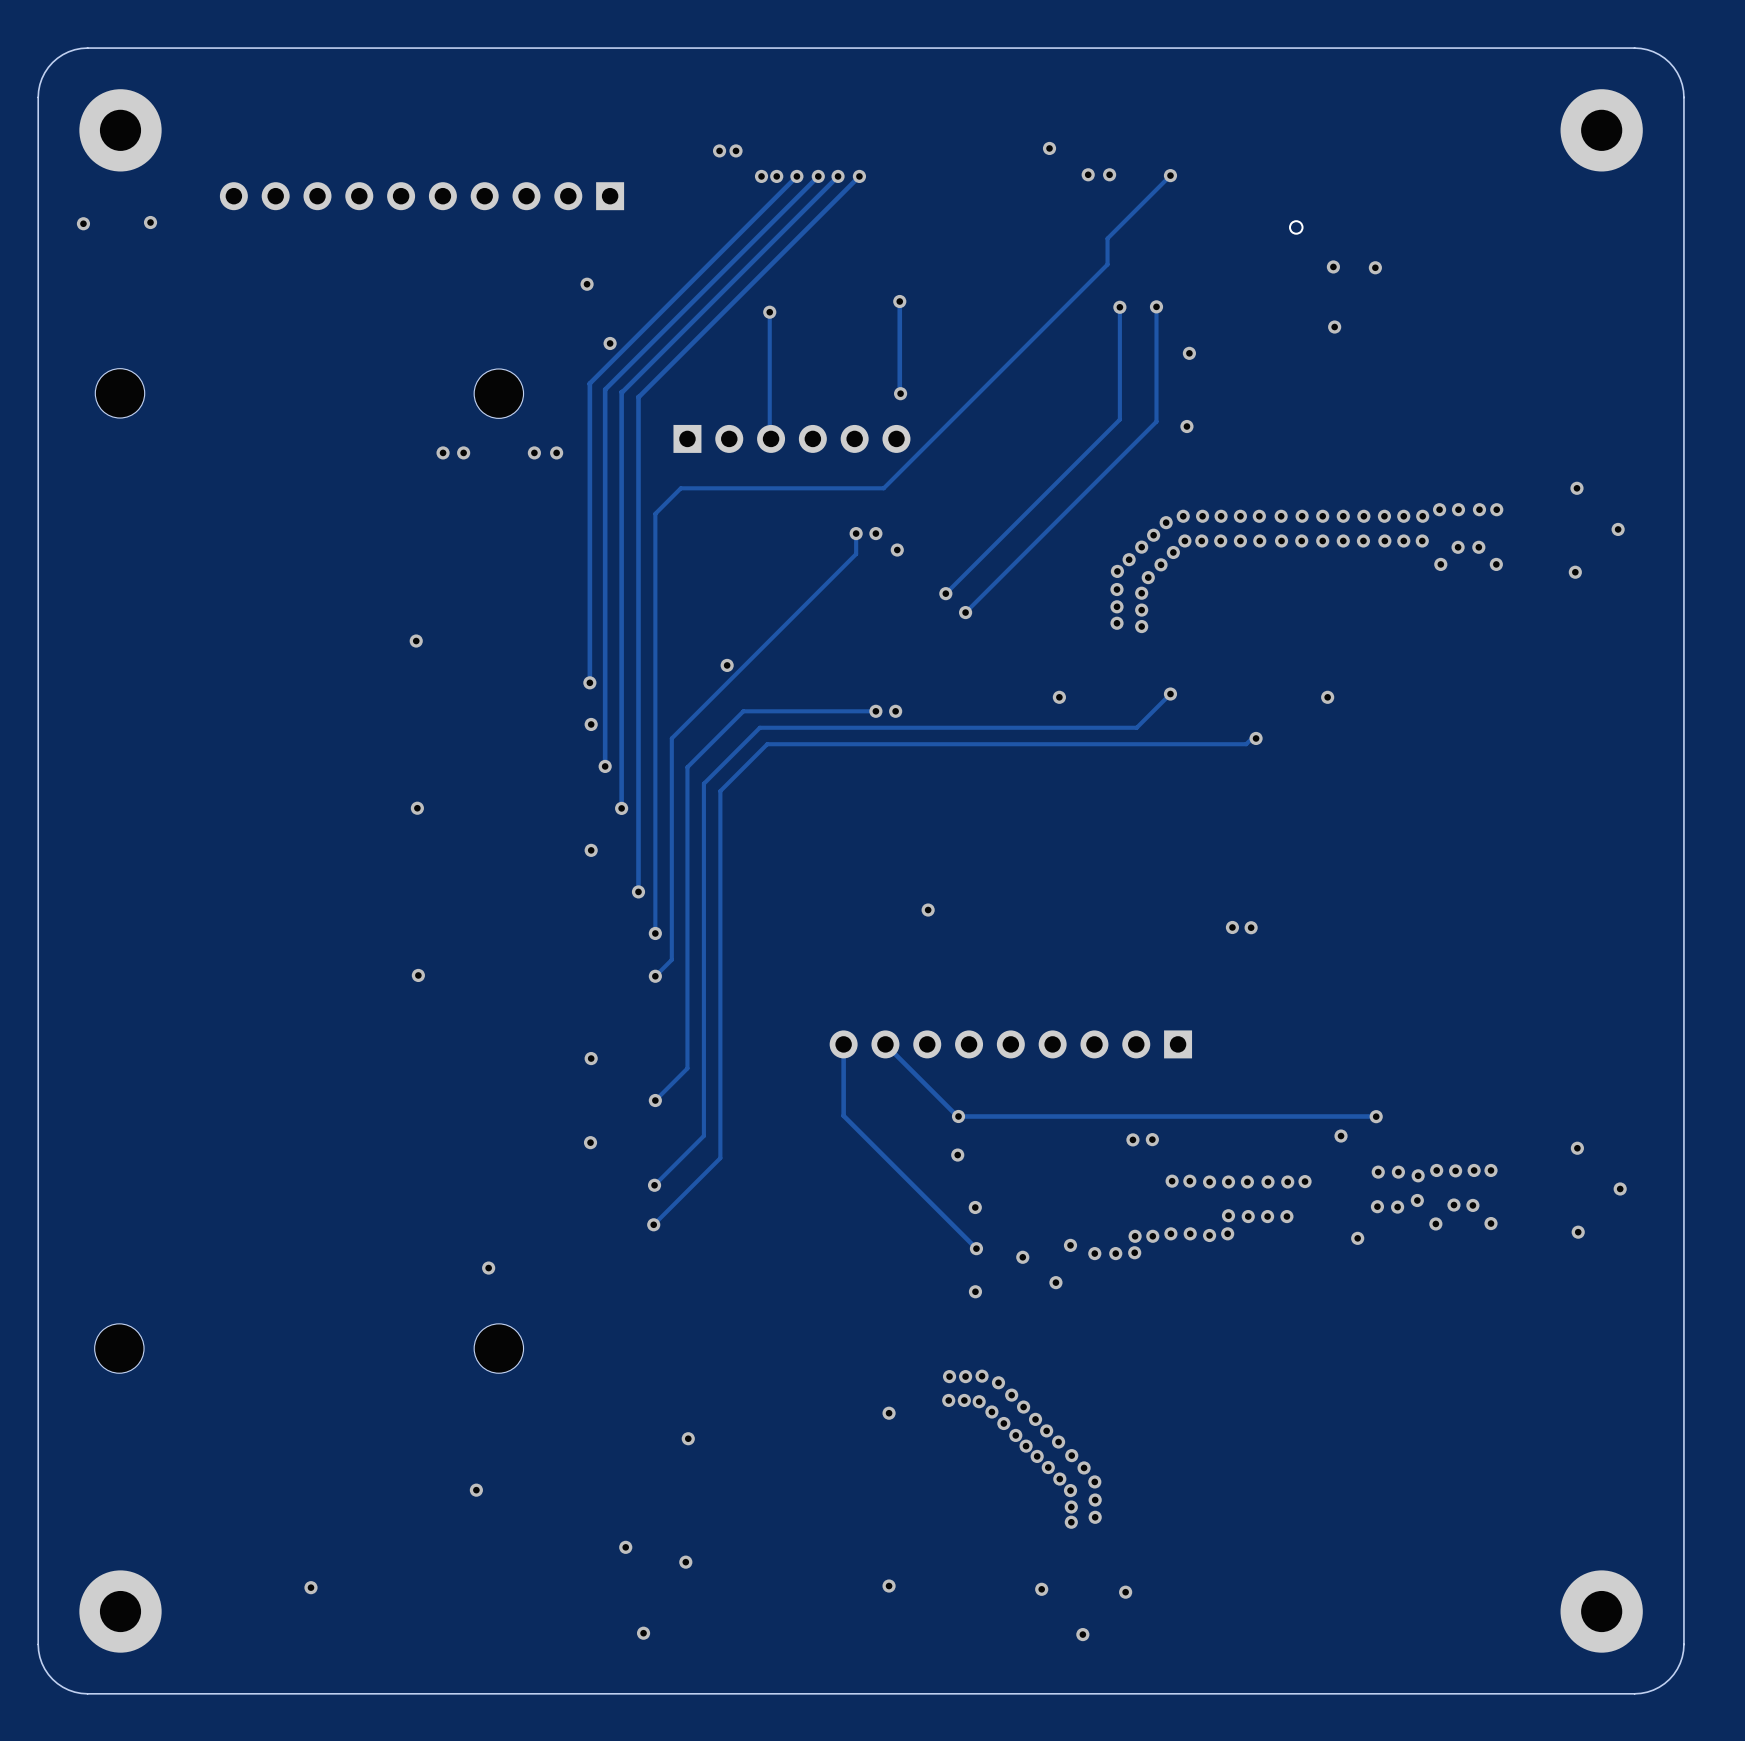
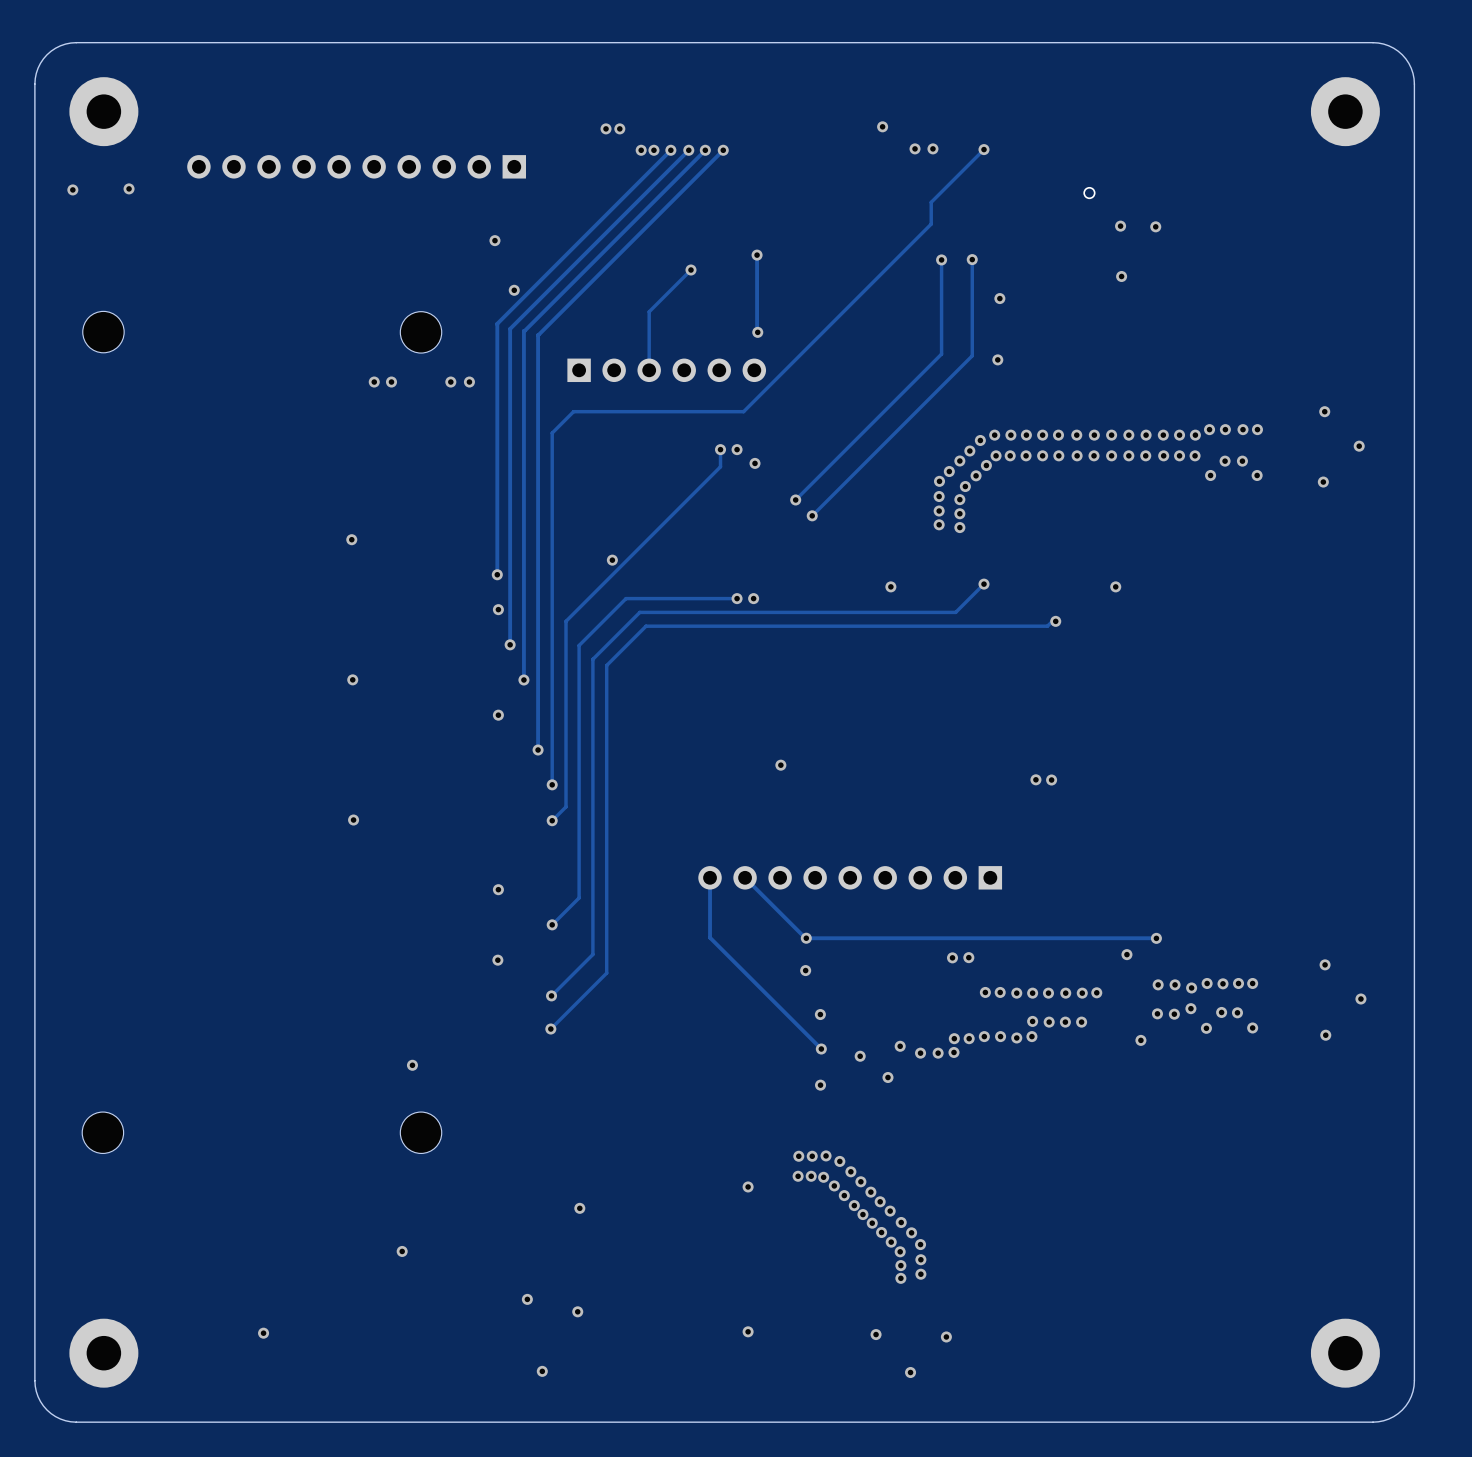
track: (769, 312) (769, 437) -> none
via position: (769, 312) -> (690, 270)
track: none -> (690, 270) (649, 311) (649, 370)

